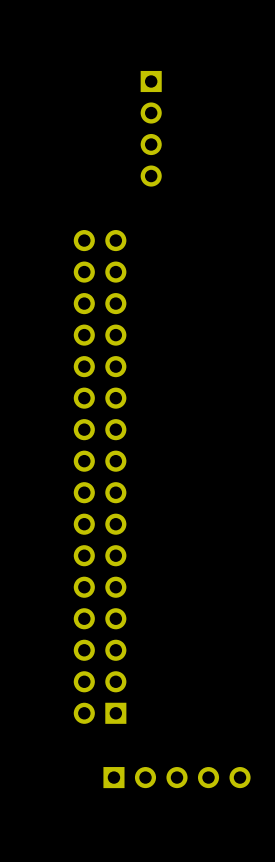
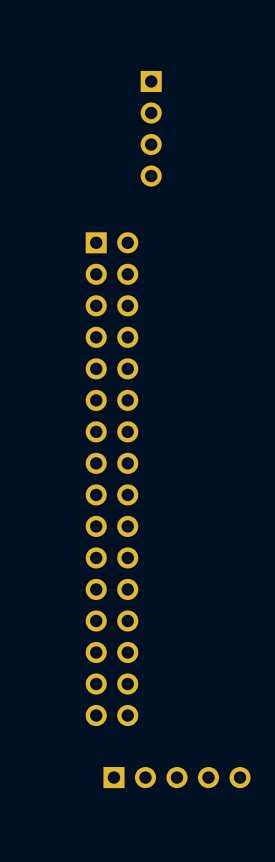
part rotation: 0° (100, 476) -> 180° (111, 479)

